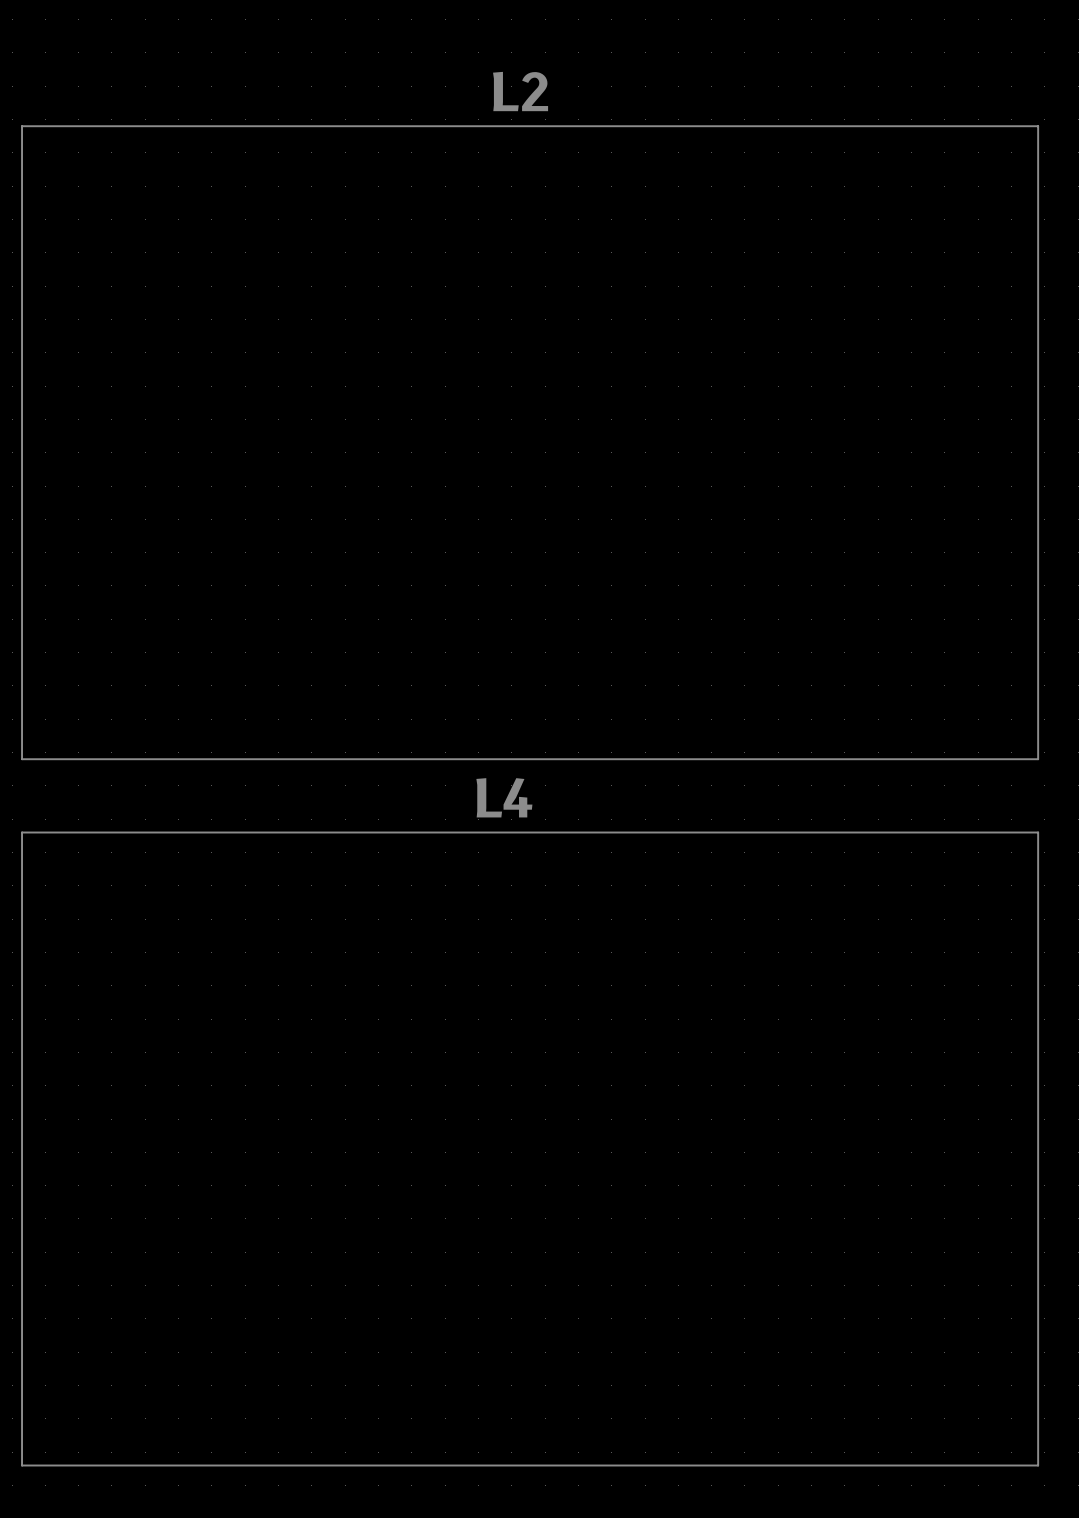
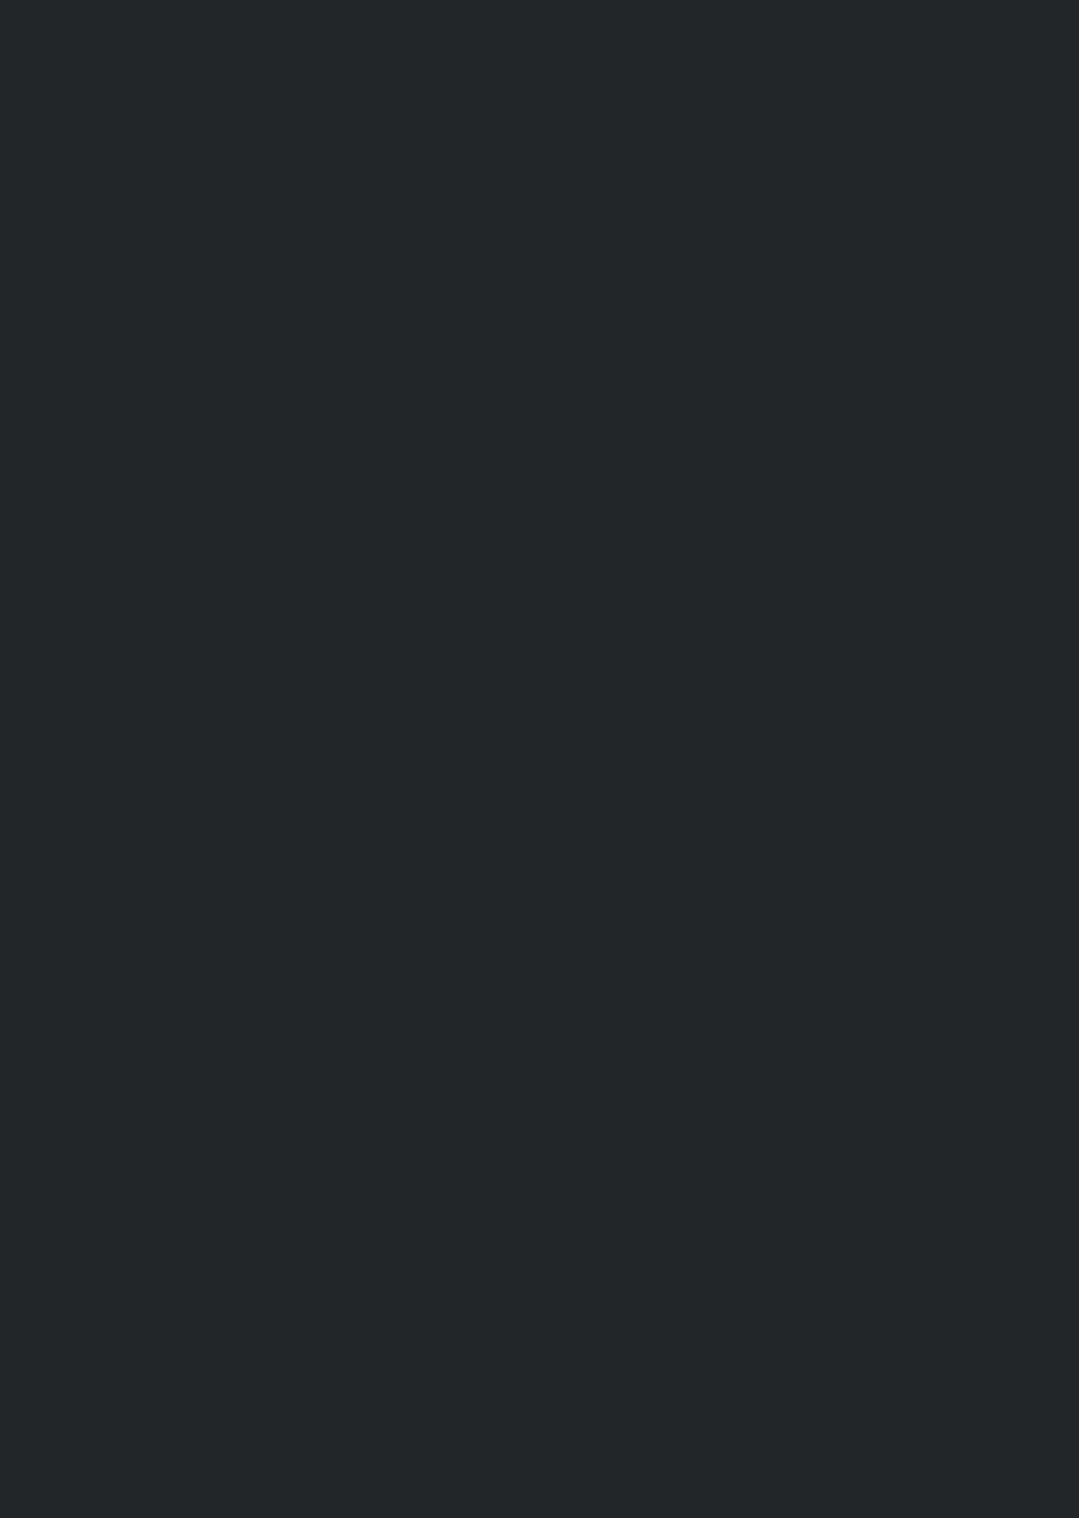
text: L2 (520, 91) -> none
line: (22, 126) (22, 759) (1038, 759) (1038, 126) (22, 126) -> none
text: L4 (504, 797) -> none
line: (22, 832) (1038, 832) (1038, 1465) (22, 1465) (22, 832) -> none

